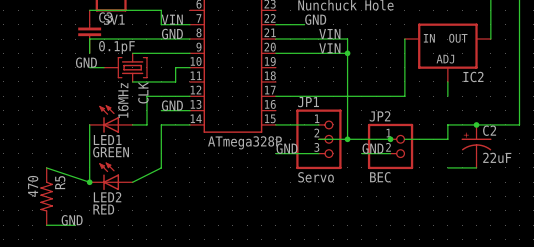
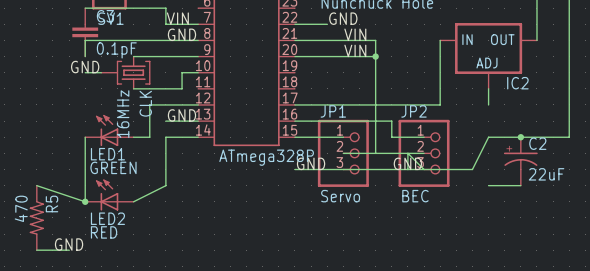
wire: none -> (294, 121) (391, 121) (391, 137) (424, 137)
JP2 symbol: [367, 123, 414, 170] -> [398, 119, 450, 187]
wire: (447, 124) (447, 139) (404, 139) -> (488, 137) (472, 169) (424, 169) (407, 153) (407, 169)
junction: (347, 139) -> none
junction: (390, 139) -> none
wire: none -> (343, 169) (391, 169)

